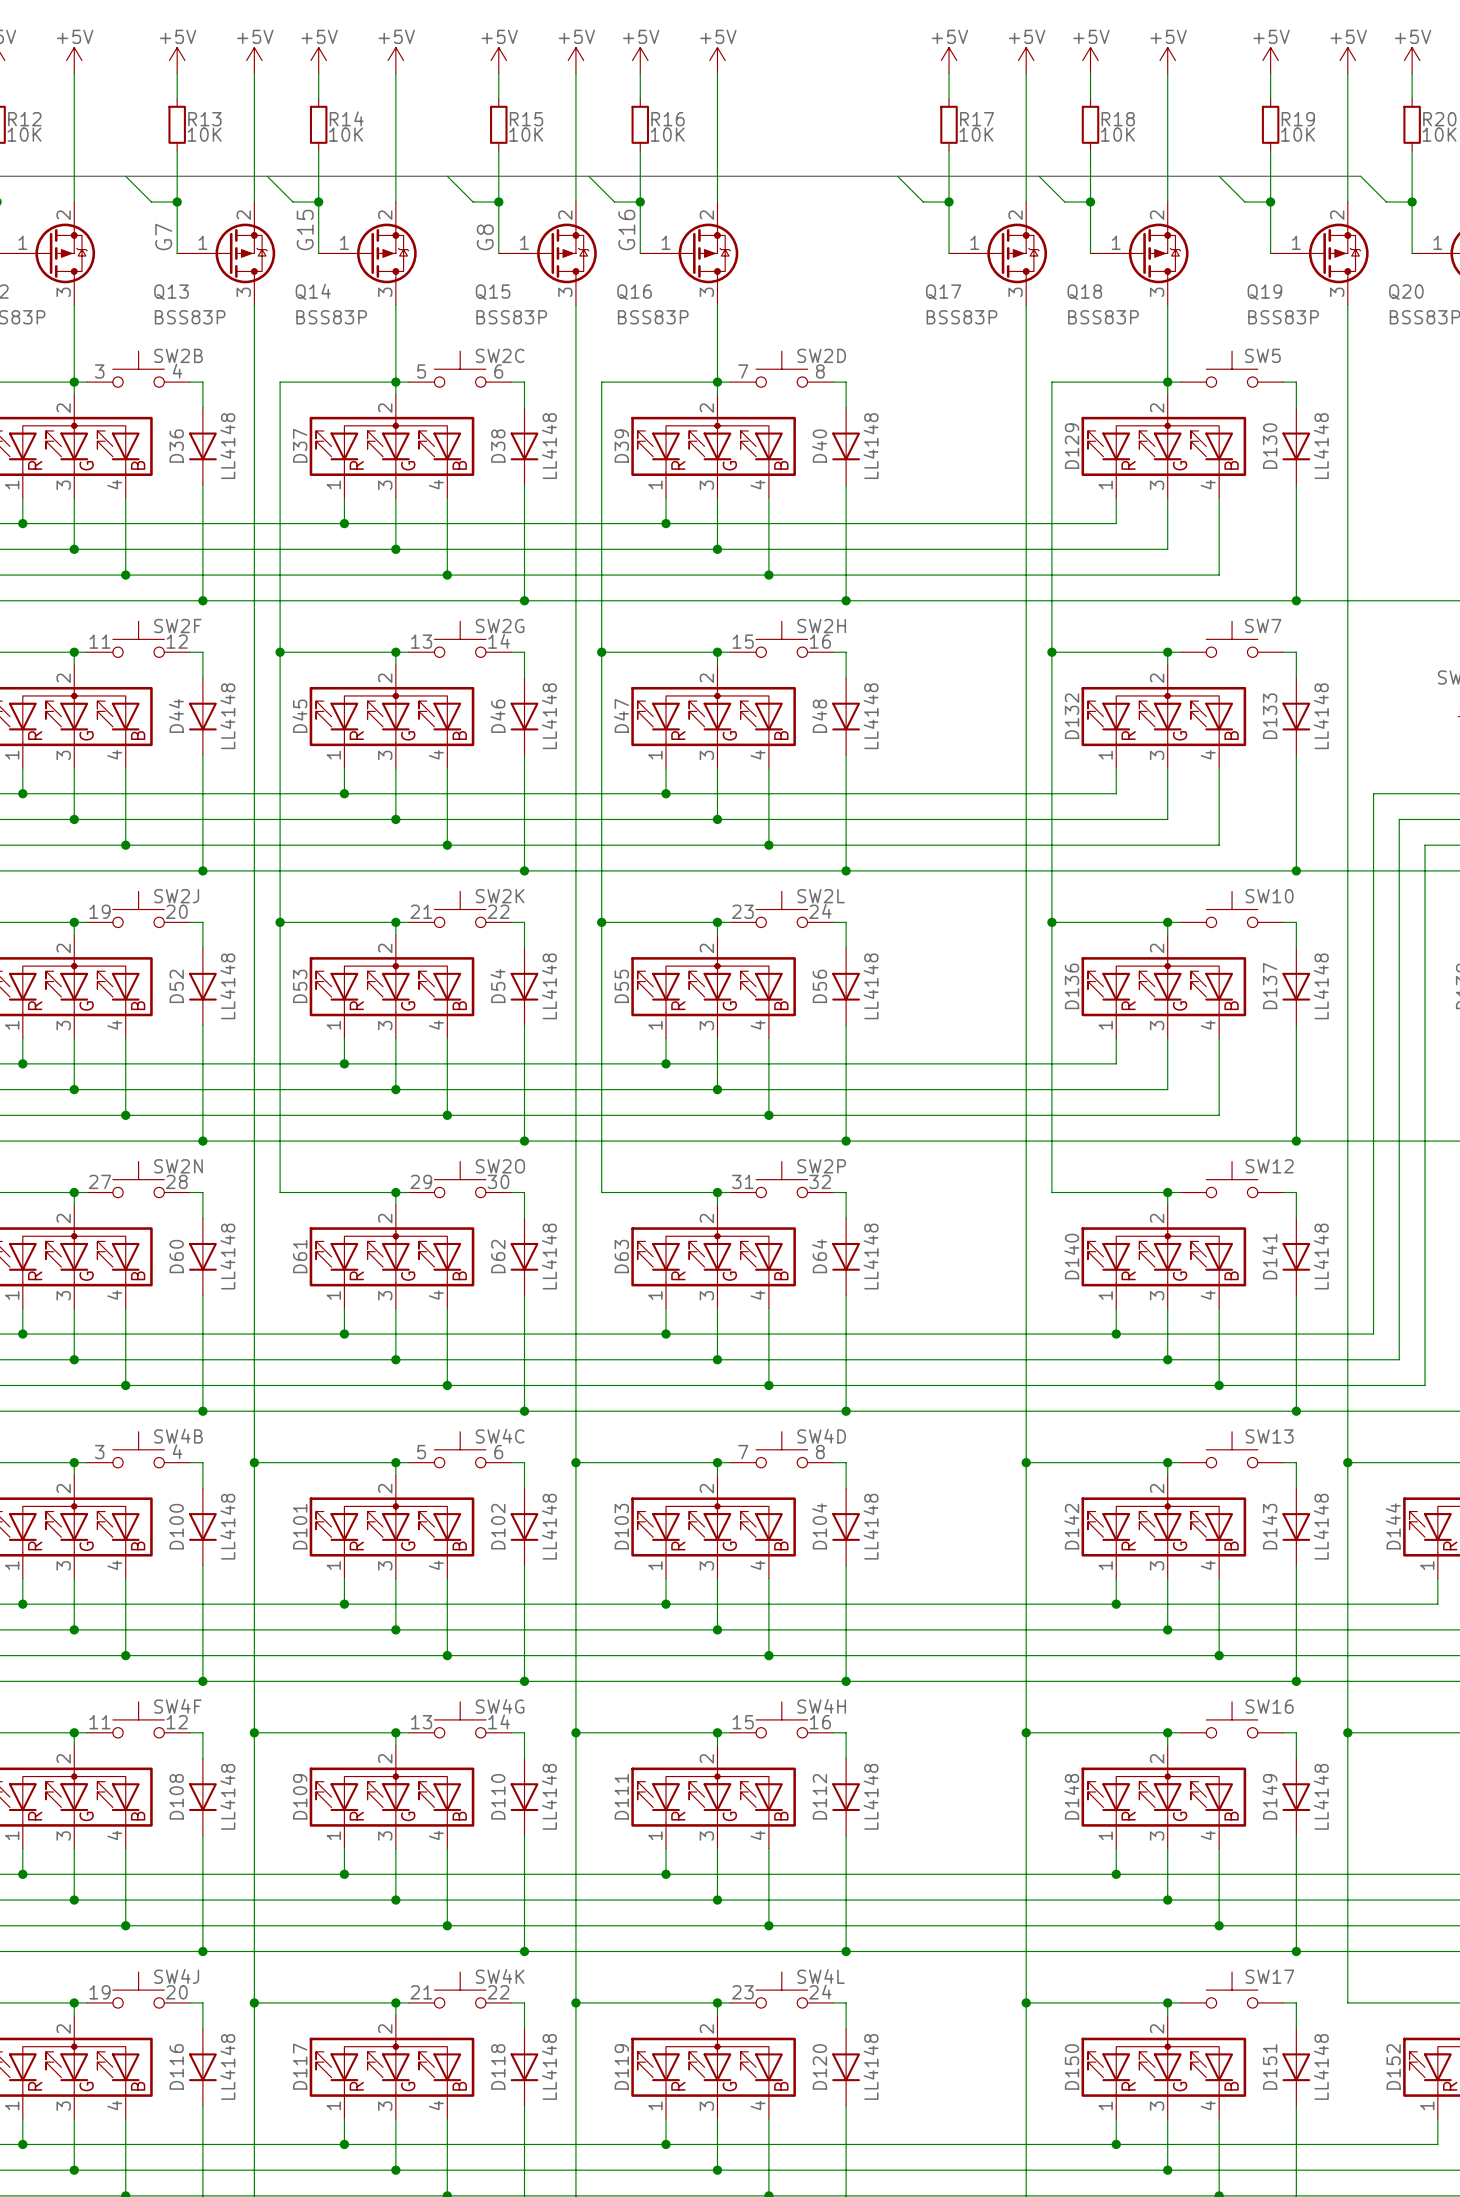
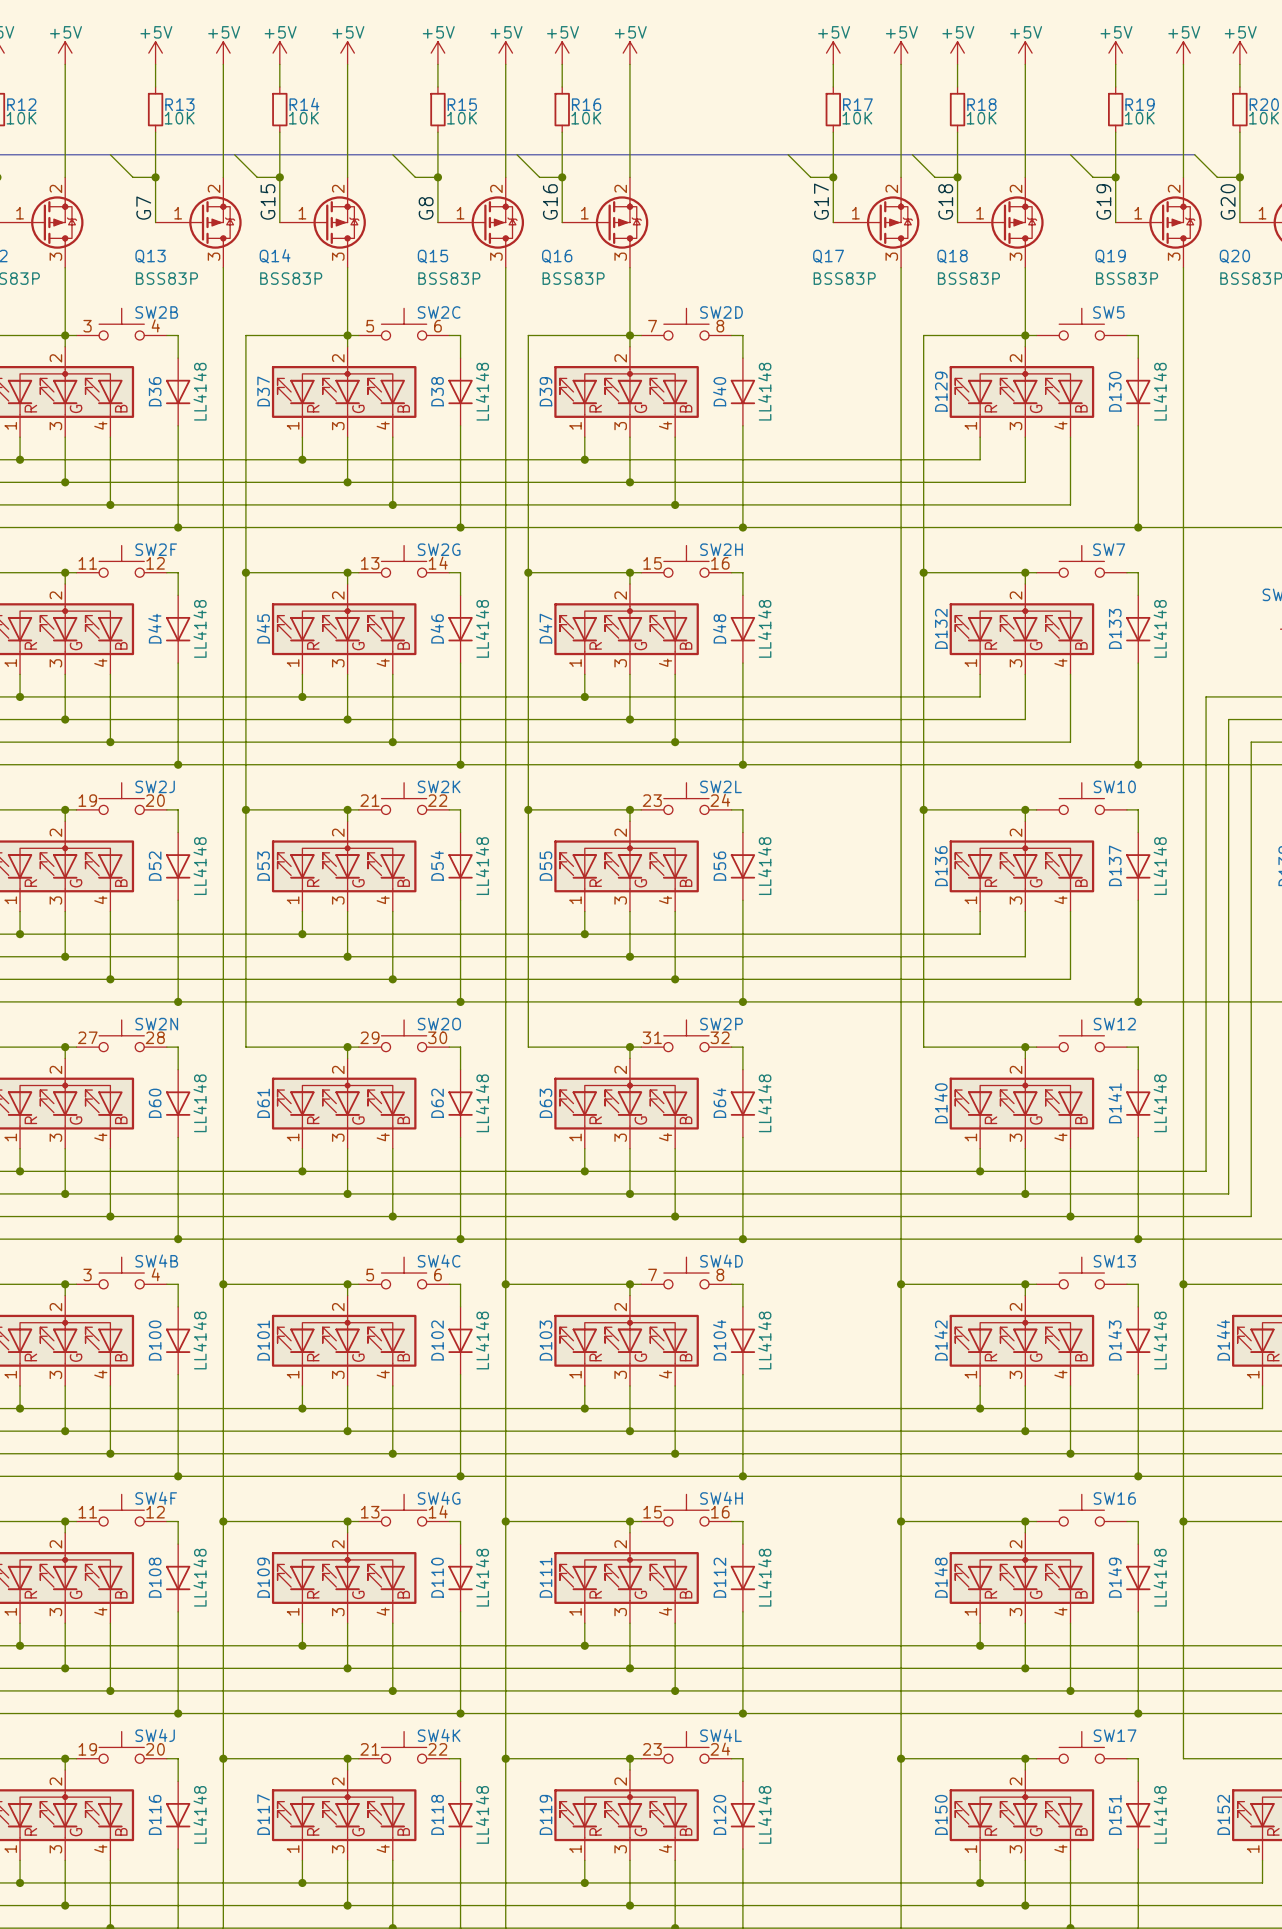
label: none -> G17 (821, 201)
label: none -> G18 (945, 201)
label: none -> G19 (1103, 201)
label: none -> G20 (1228, 201)

